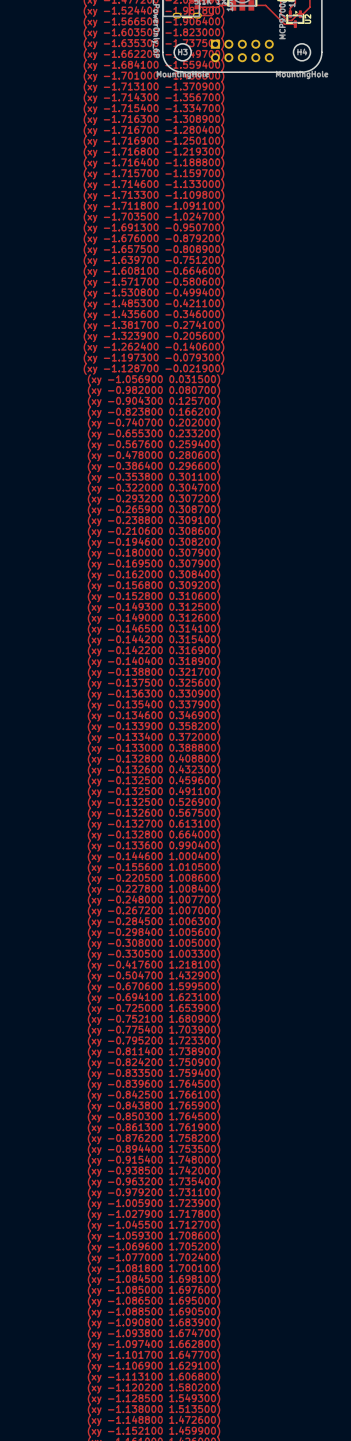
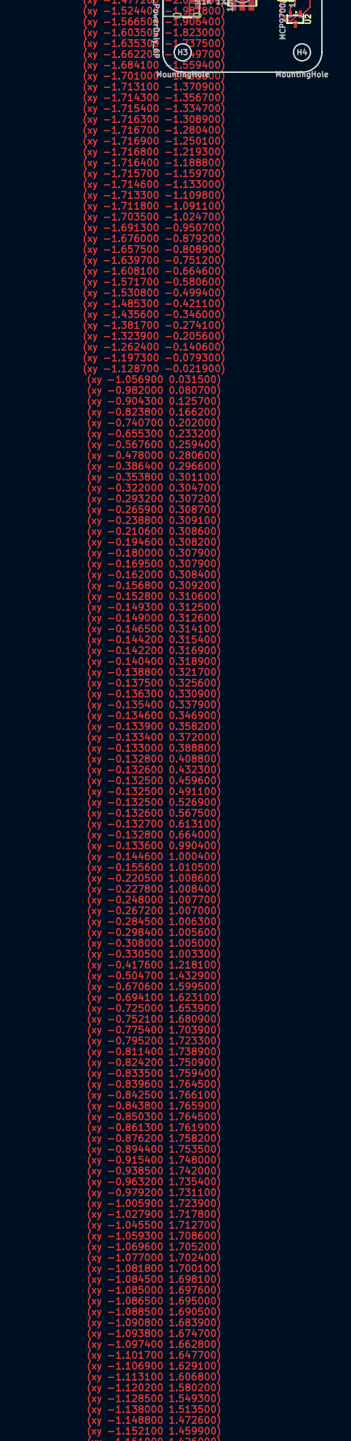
top track: (197, 7) (265, 5) (284, 24) (295, 24) -> none
top track: (213, 7) (211, 15) (197, 15) -> none
part: (242, 50) -> none

